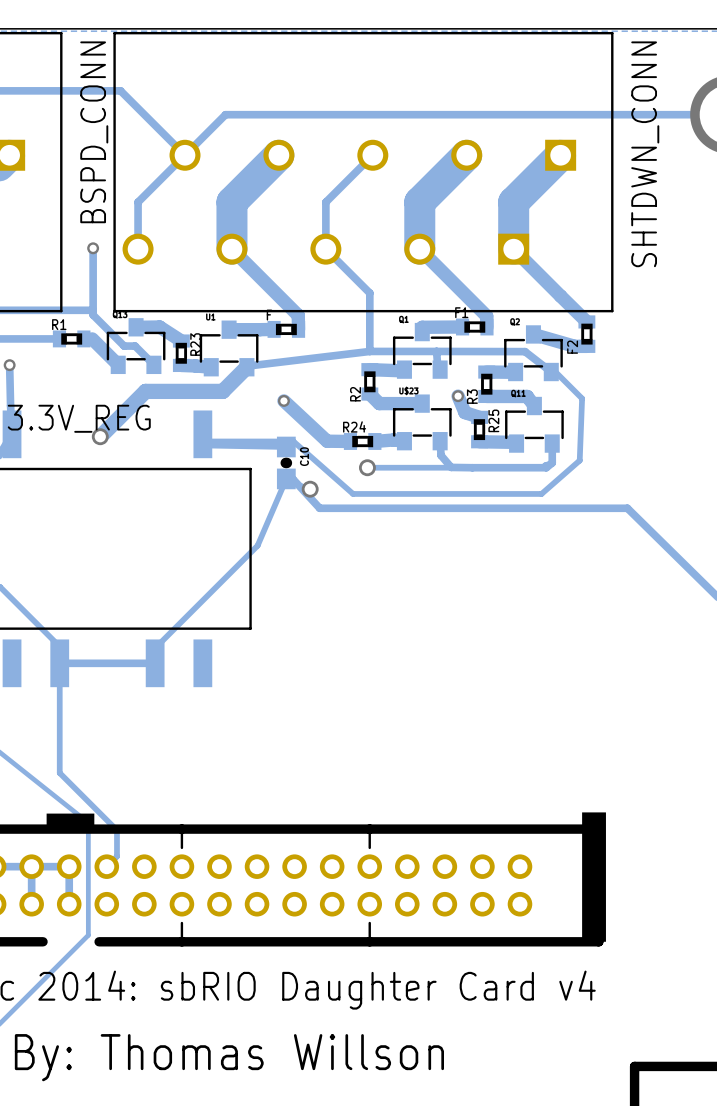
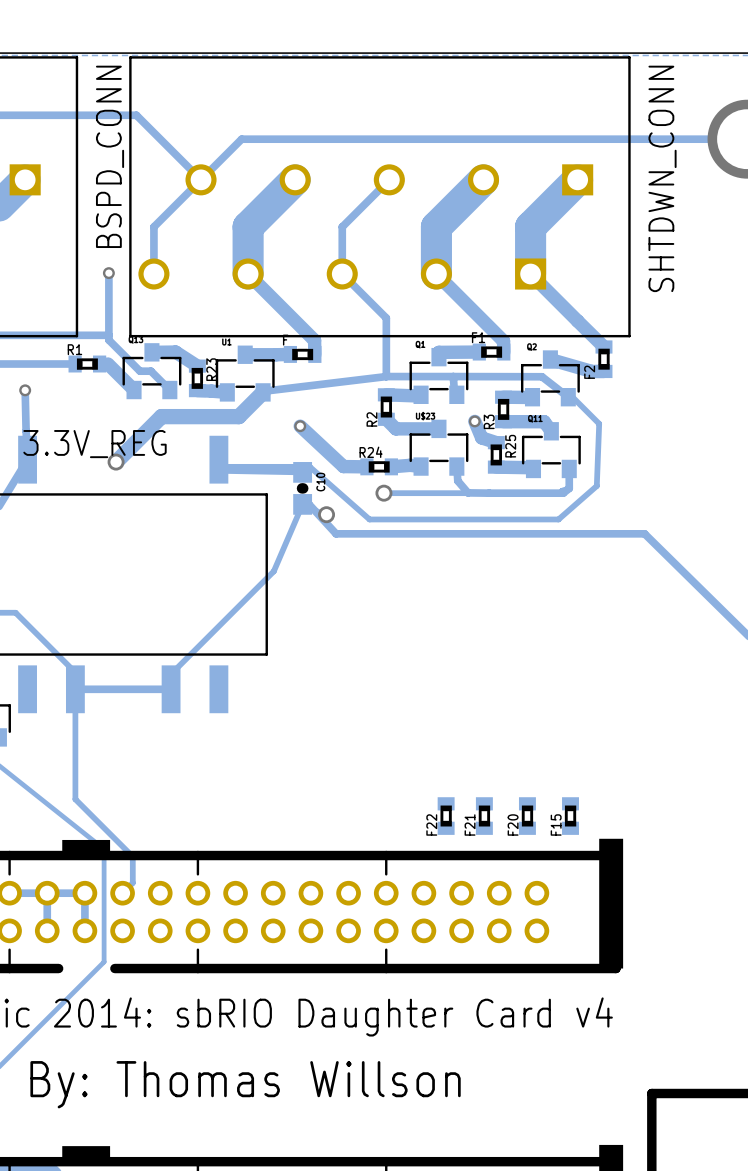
F22: none -> (446, 816)
F21: none -> (484, 816)
F20: none -> (527, 816)
F15: none -> (570, 816)

